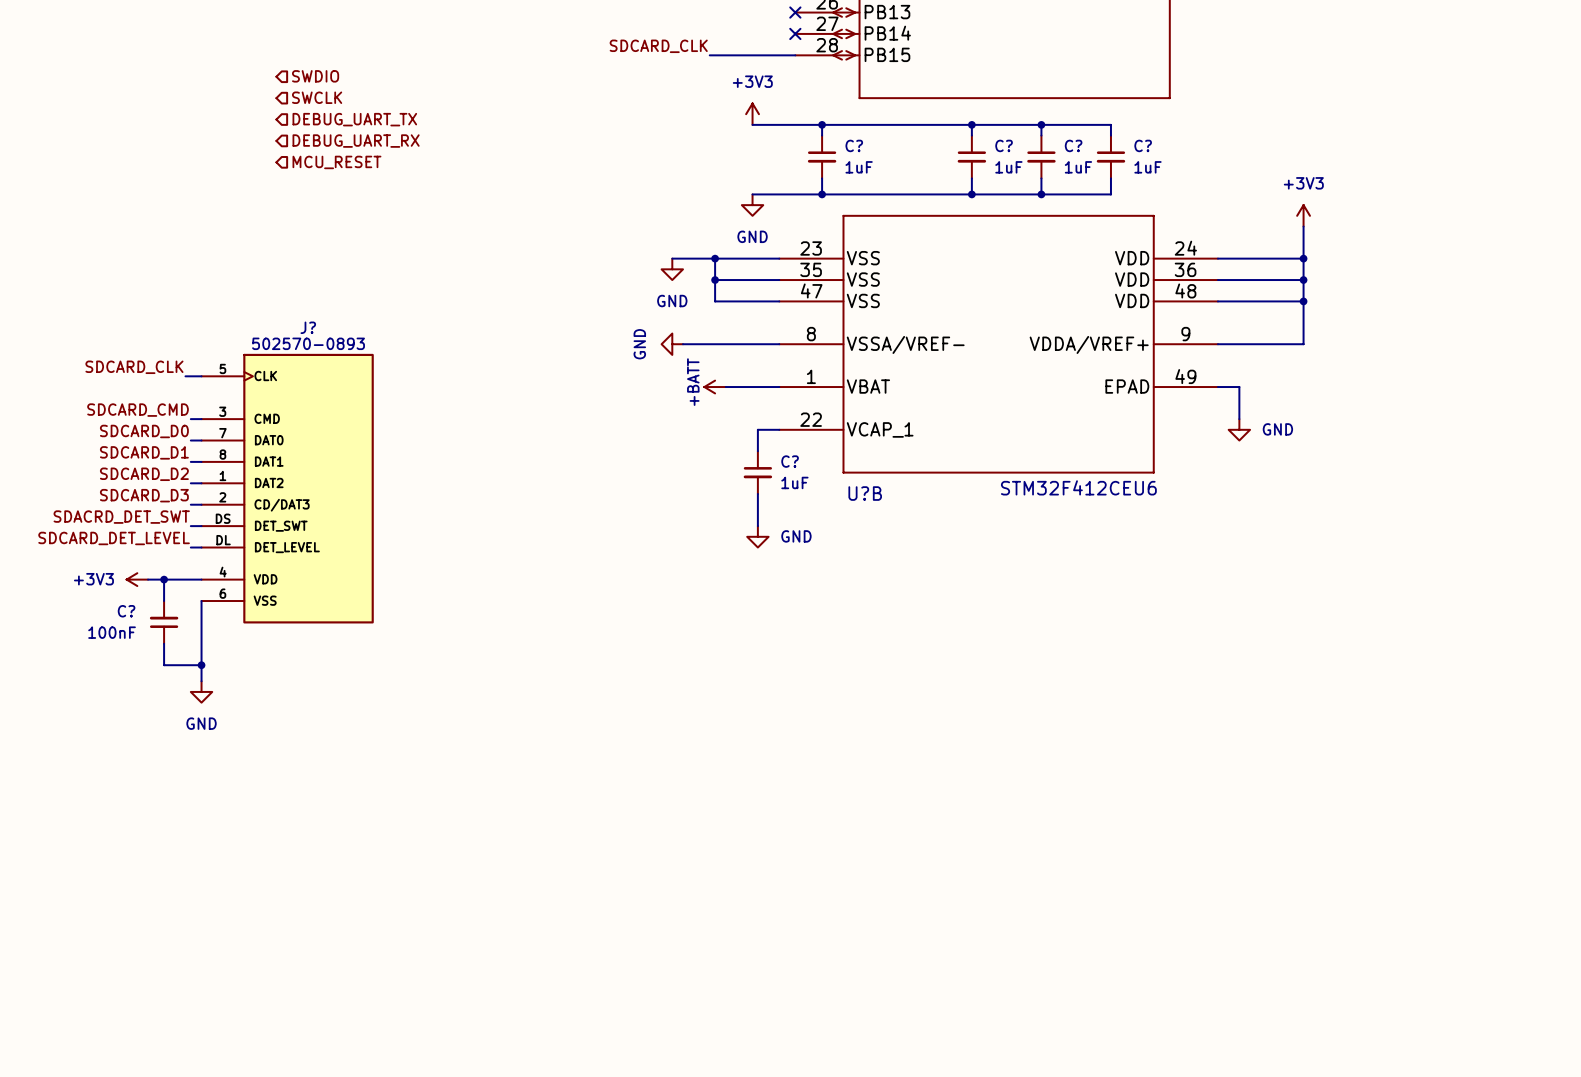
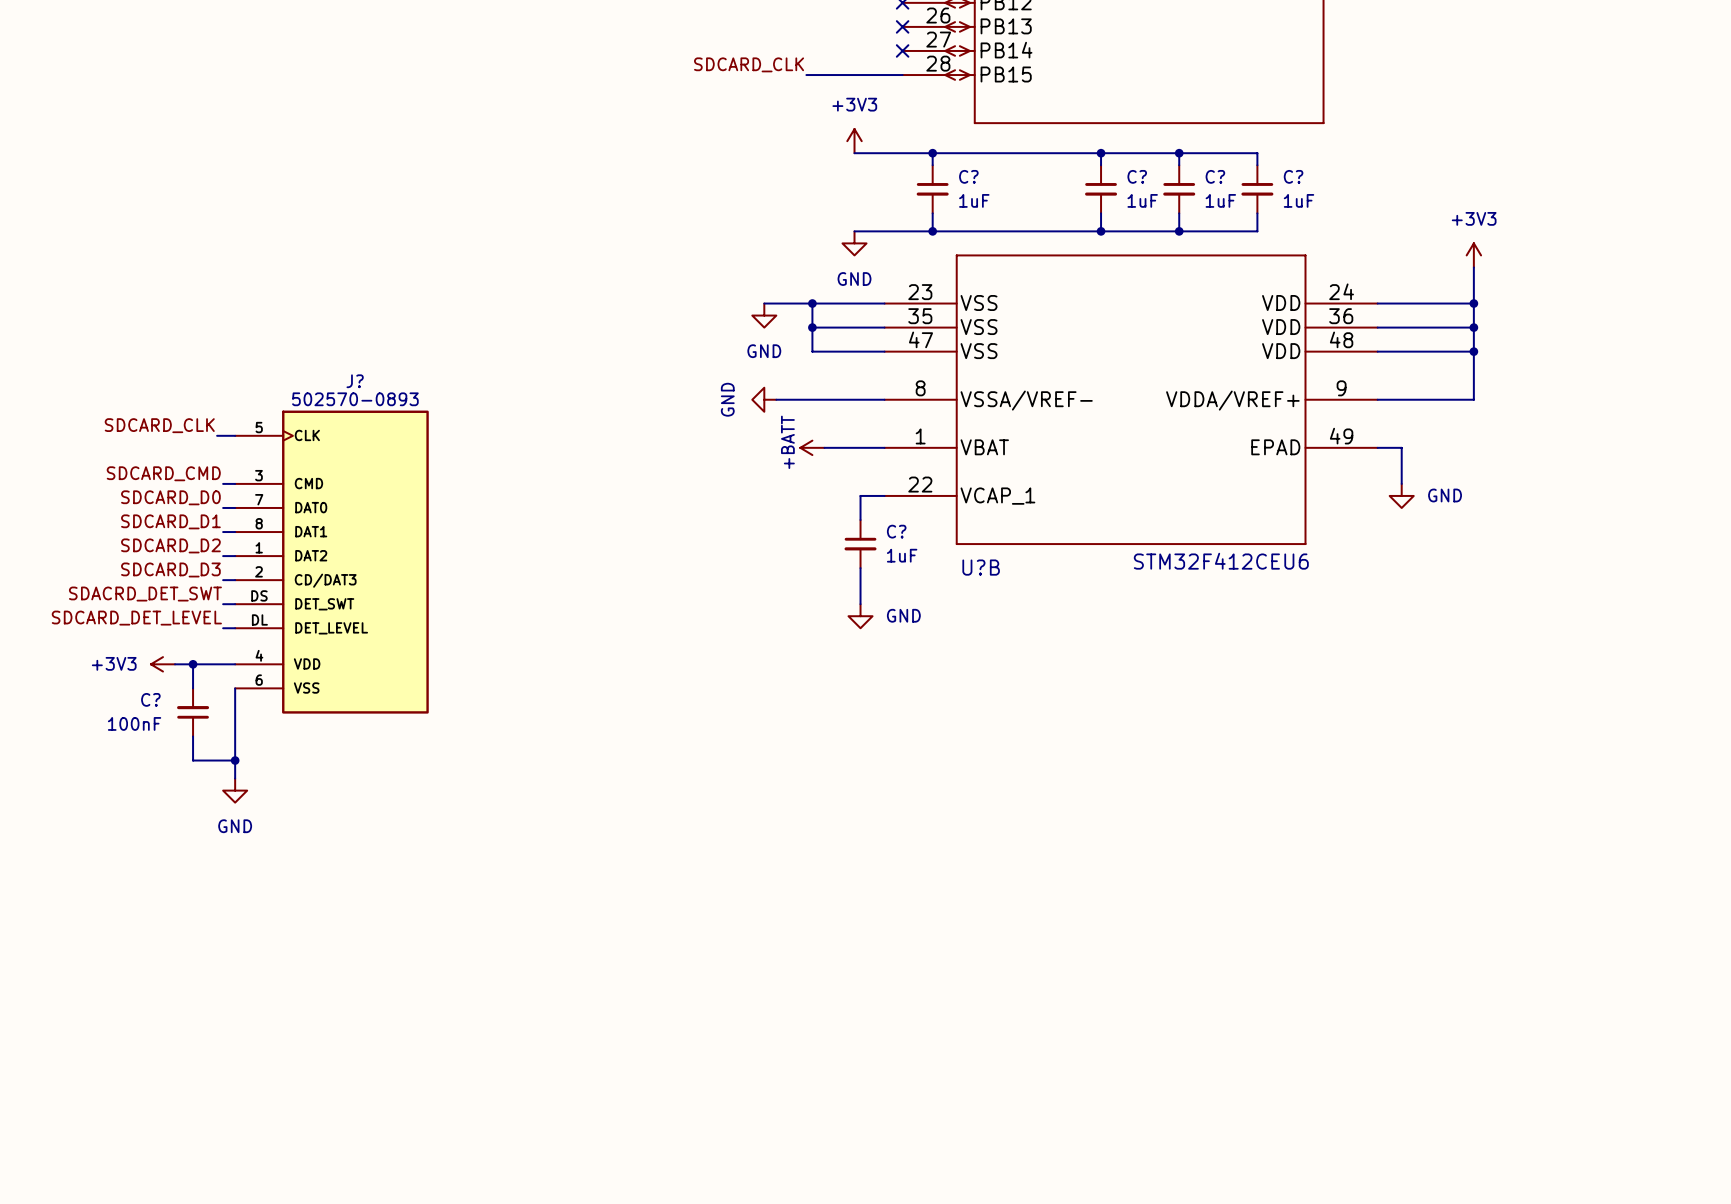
hierarchical label: SWDIO (315, 76) -> none
hierarchical label: SWCLK (317, 97) -> none
hierarchical label: DEBUG_UART_TX (354, 119) -> none
hierarchical label: DEBUG_UART_RX (356, 141) -> none
hierarchical label: MCU_RESET (336, 162) -> none

